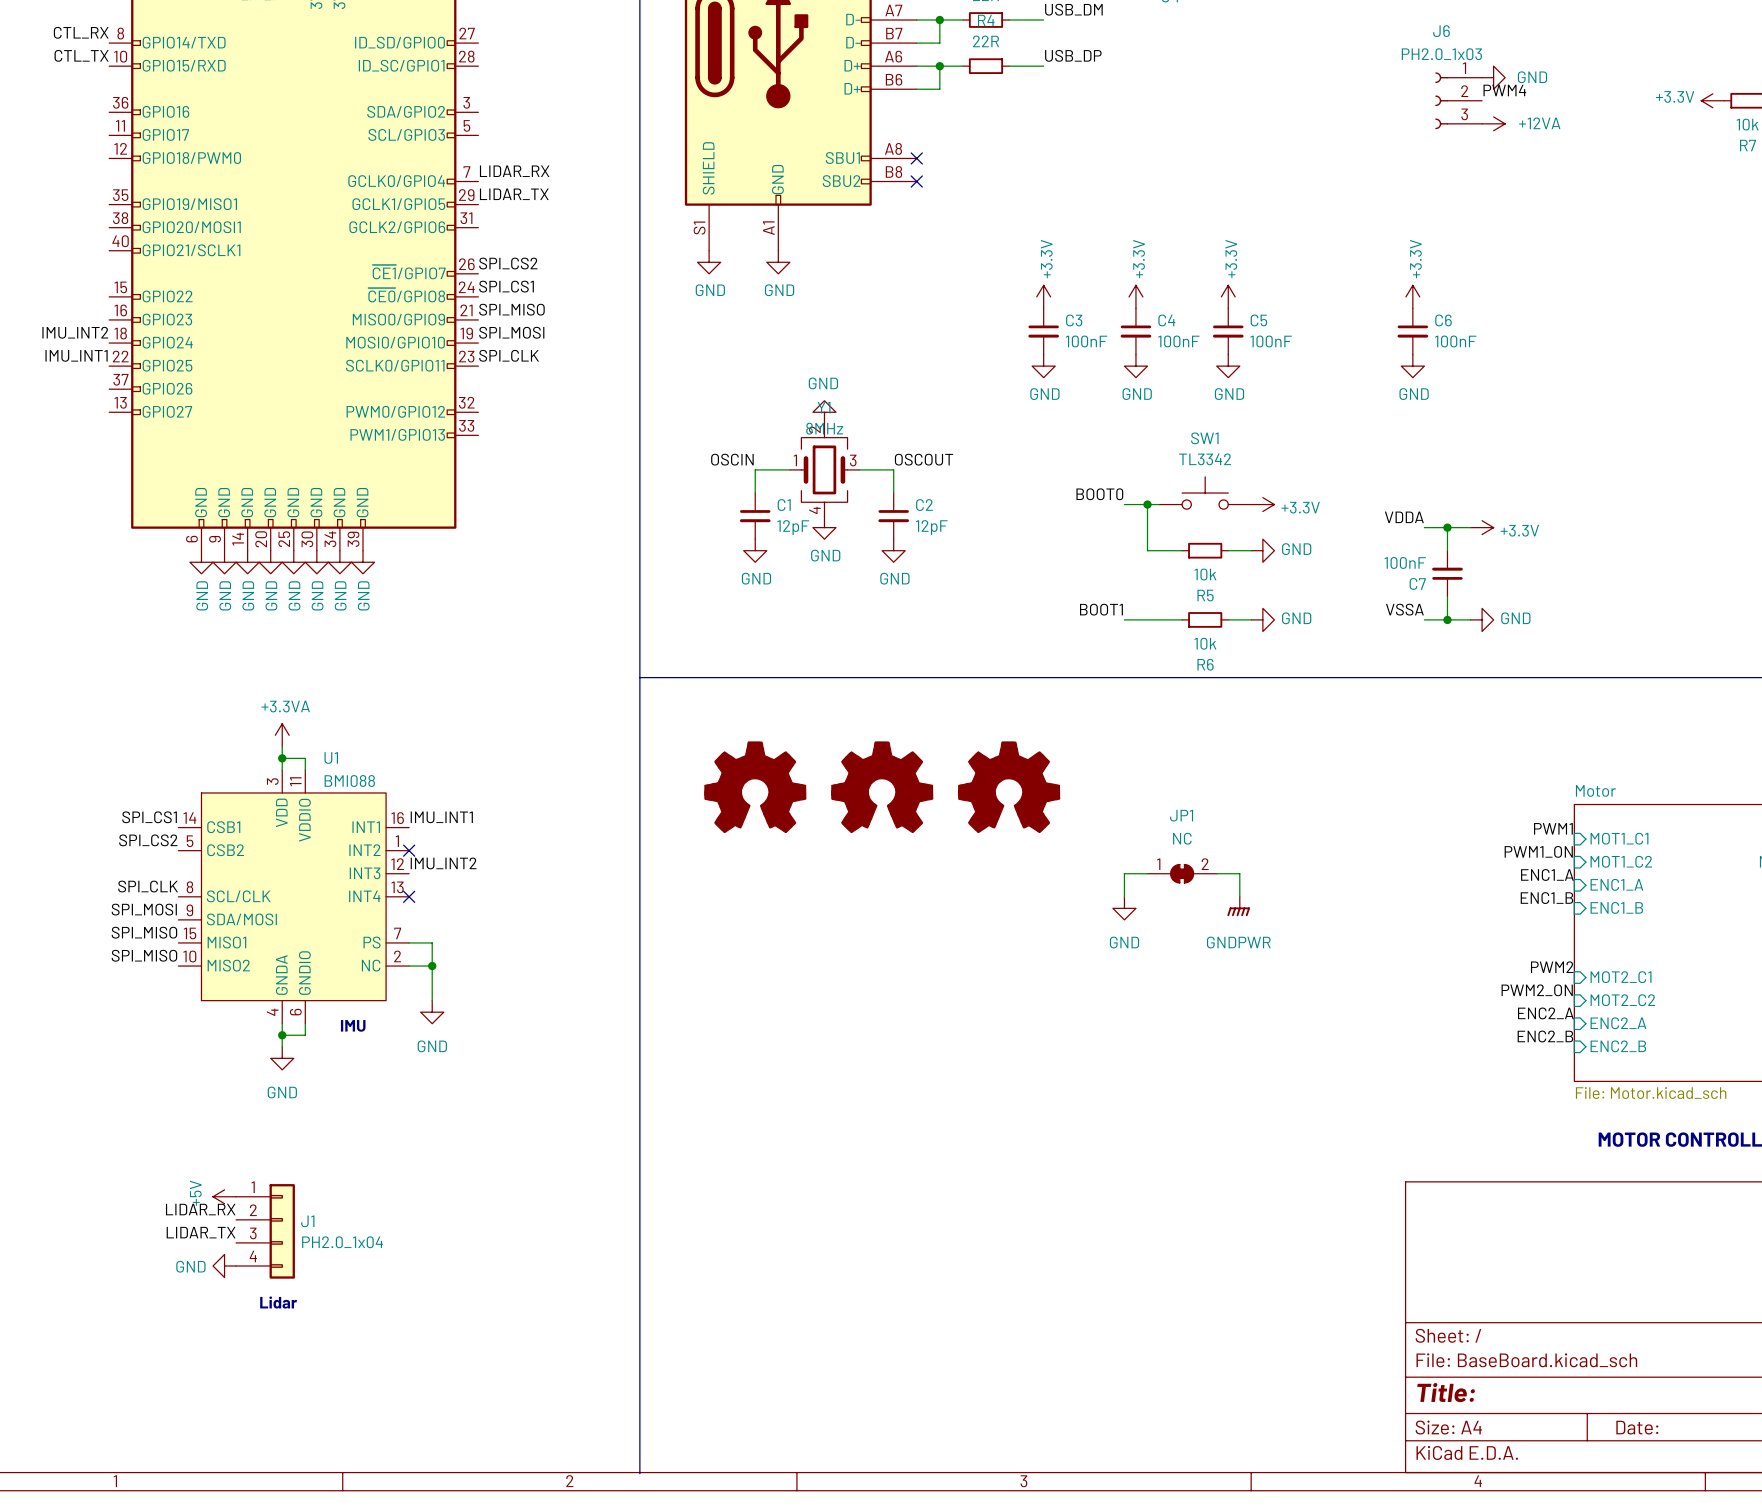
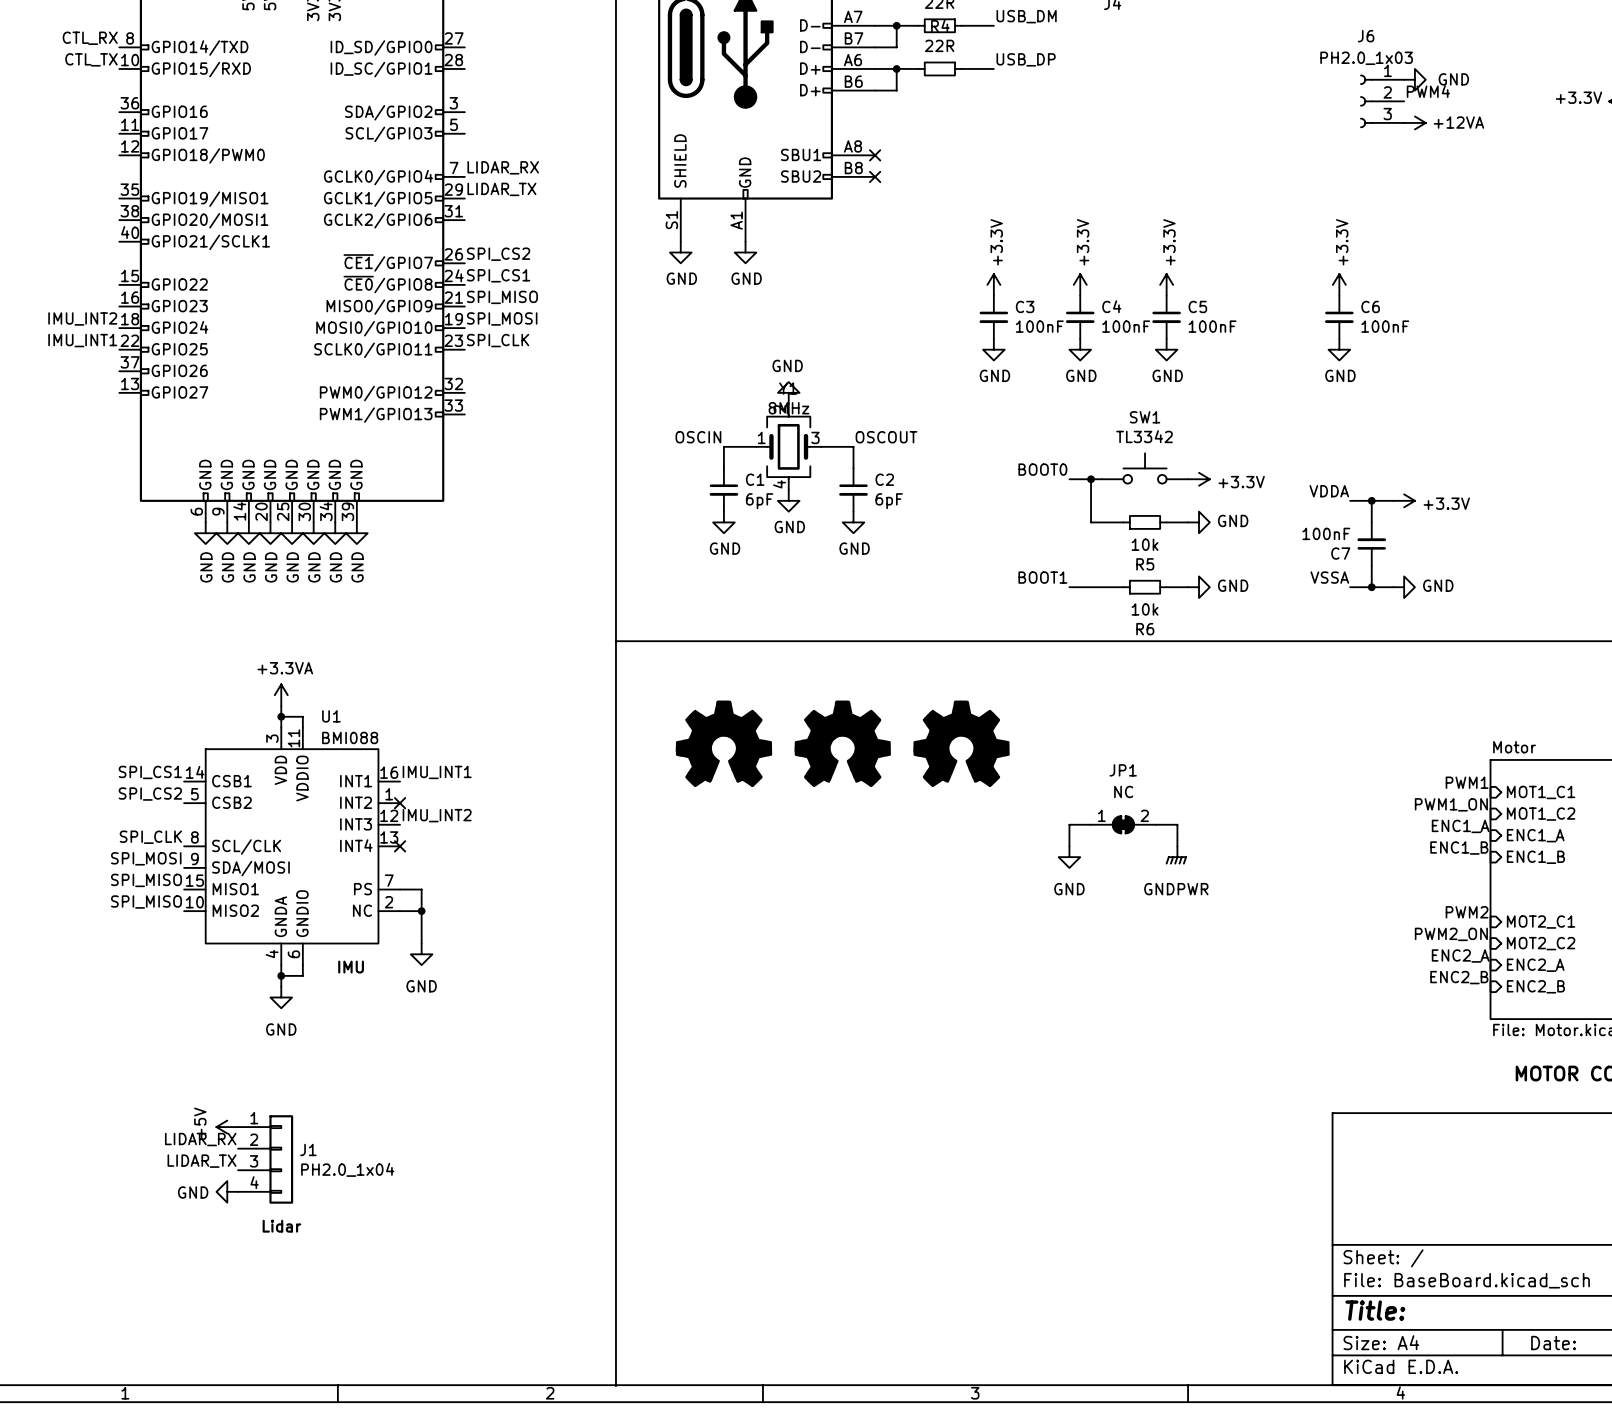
C1 value: 12pF (793, 527) -> 6pF (759, 501)
C2 value: 12pF (931, 527) -> 6pF (889, 501)

